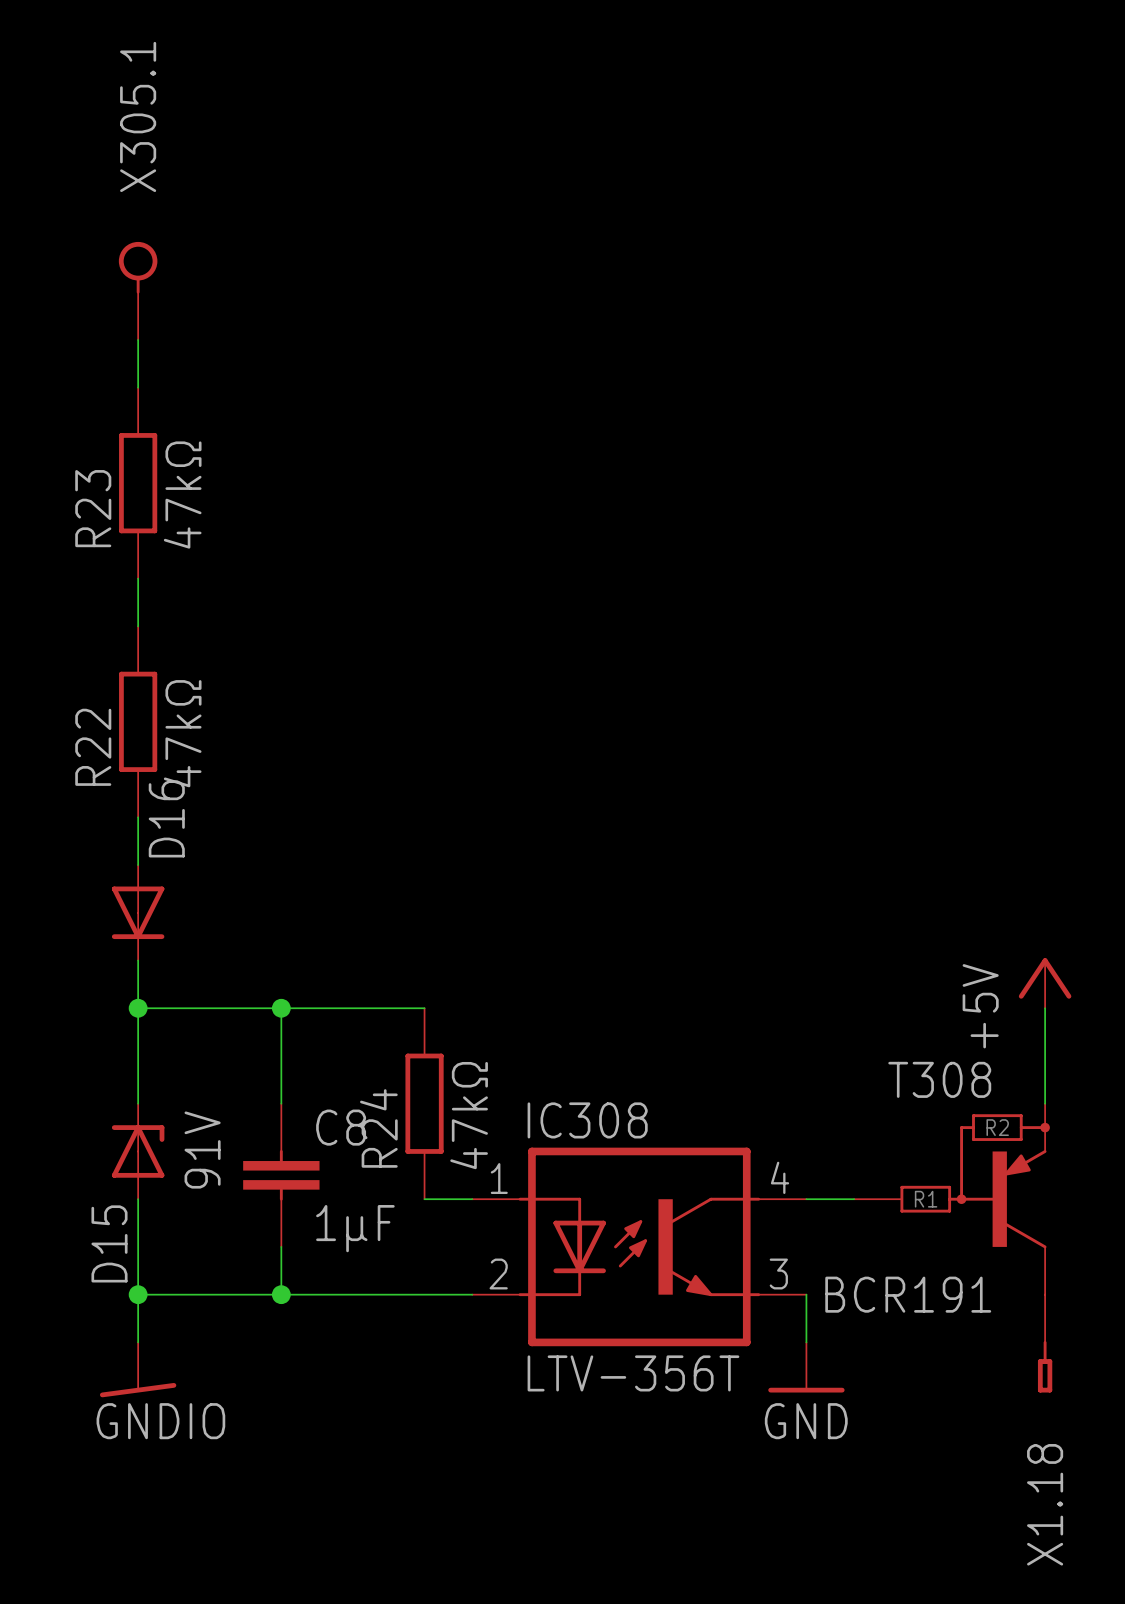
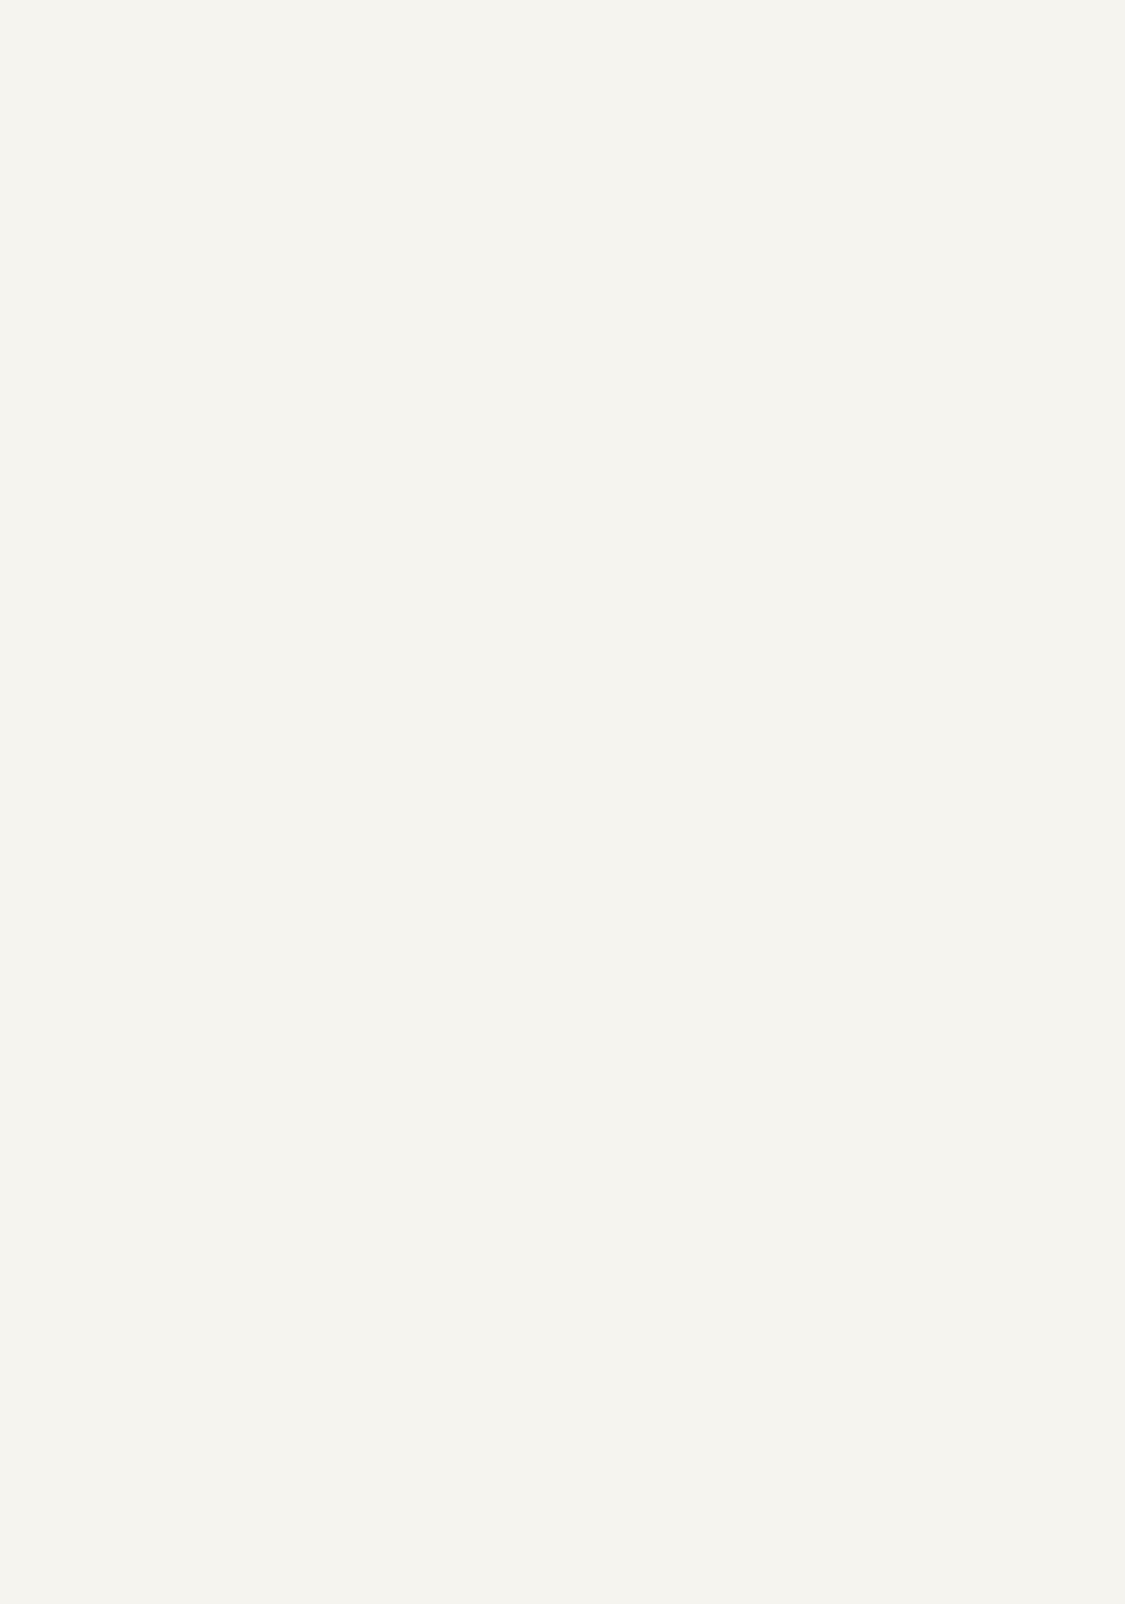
X305.1: (138, 290) -> none
wire: (138, 339) (138, 387) -> none
R23: 47kΩ (138, 483) -> none
wire: (138, 578) (138, 626) -> none
R22: 47kΩ (138, 721) -> none
wire: (138, 817) (138, 865) -> none
D16: (138, 912) -> none
wire: (138, 960) (138, 1103) -> none
power symbol: +5V (1045, 983) -> none
wire: (138, 1008) (424, 1008) -> none
junction: (138, 1008) -> none
wire: (281, 1008) (281, 1103) -> none
junction: (281, 1008) -> none
wire: (1045, 1008) (1045, 1103) -> none
R24: 47kΩ (424, 1103) -> none
D15: 91V (138, 1151) -> none
C8: 1μF (281, 1175) -> none
wire: (138, 1199) (138, 1342) -> none
wire: (424, 1199) (472, 1199) -> none
wire: (806, 1199) (854, 1199) -> none
T308: BCR191 (952, 1199) -> none
wire: (281, 1246) (281, 1294) -> none
IC308: LTV-356T (639, 1246) -> none
wire: (138, 1294) (472, 1294) -> none
junction: (138, 1294) -> none
junction: (281, 1294) -> none
wire: (806, 1294) (806, 1342) -> none
X1.18: (1045, 1343) -> none
power symbol: GND (806, 1367) -> none
power symbol: GNDIO (138, 1369) -> none

